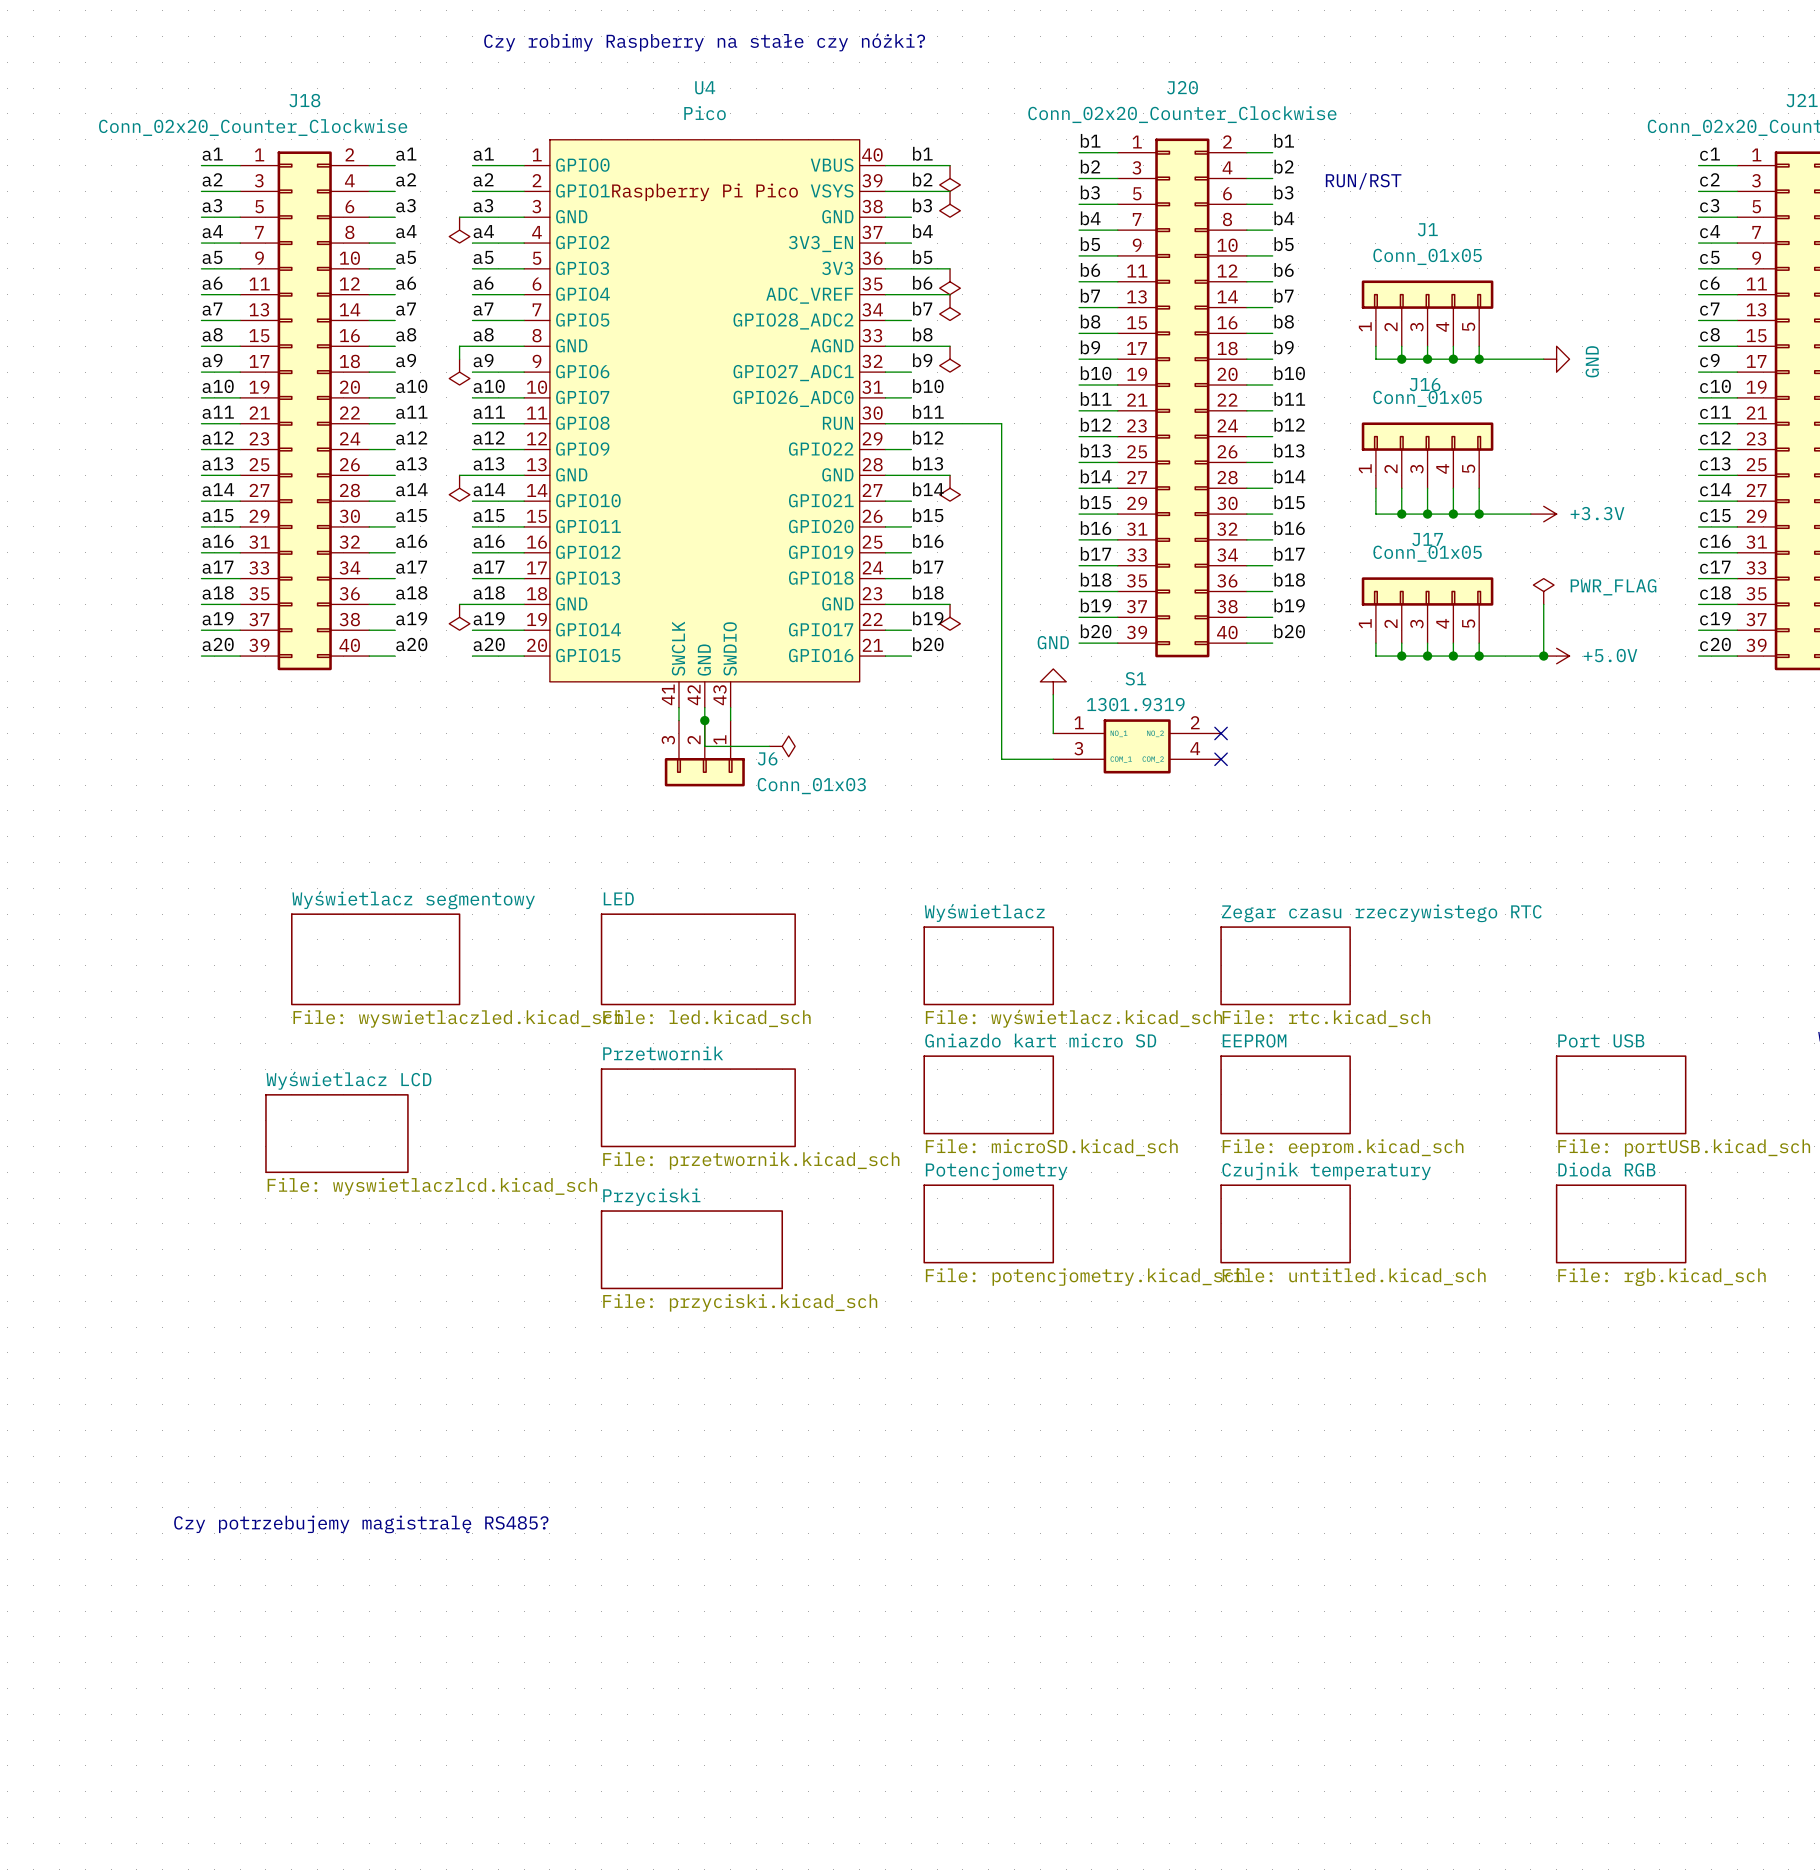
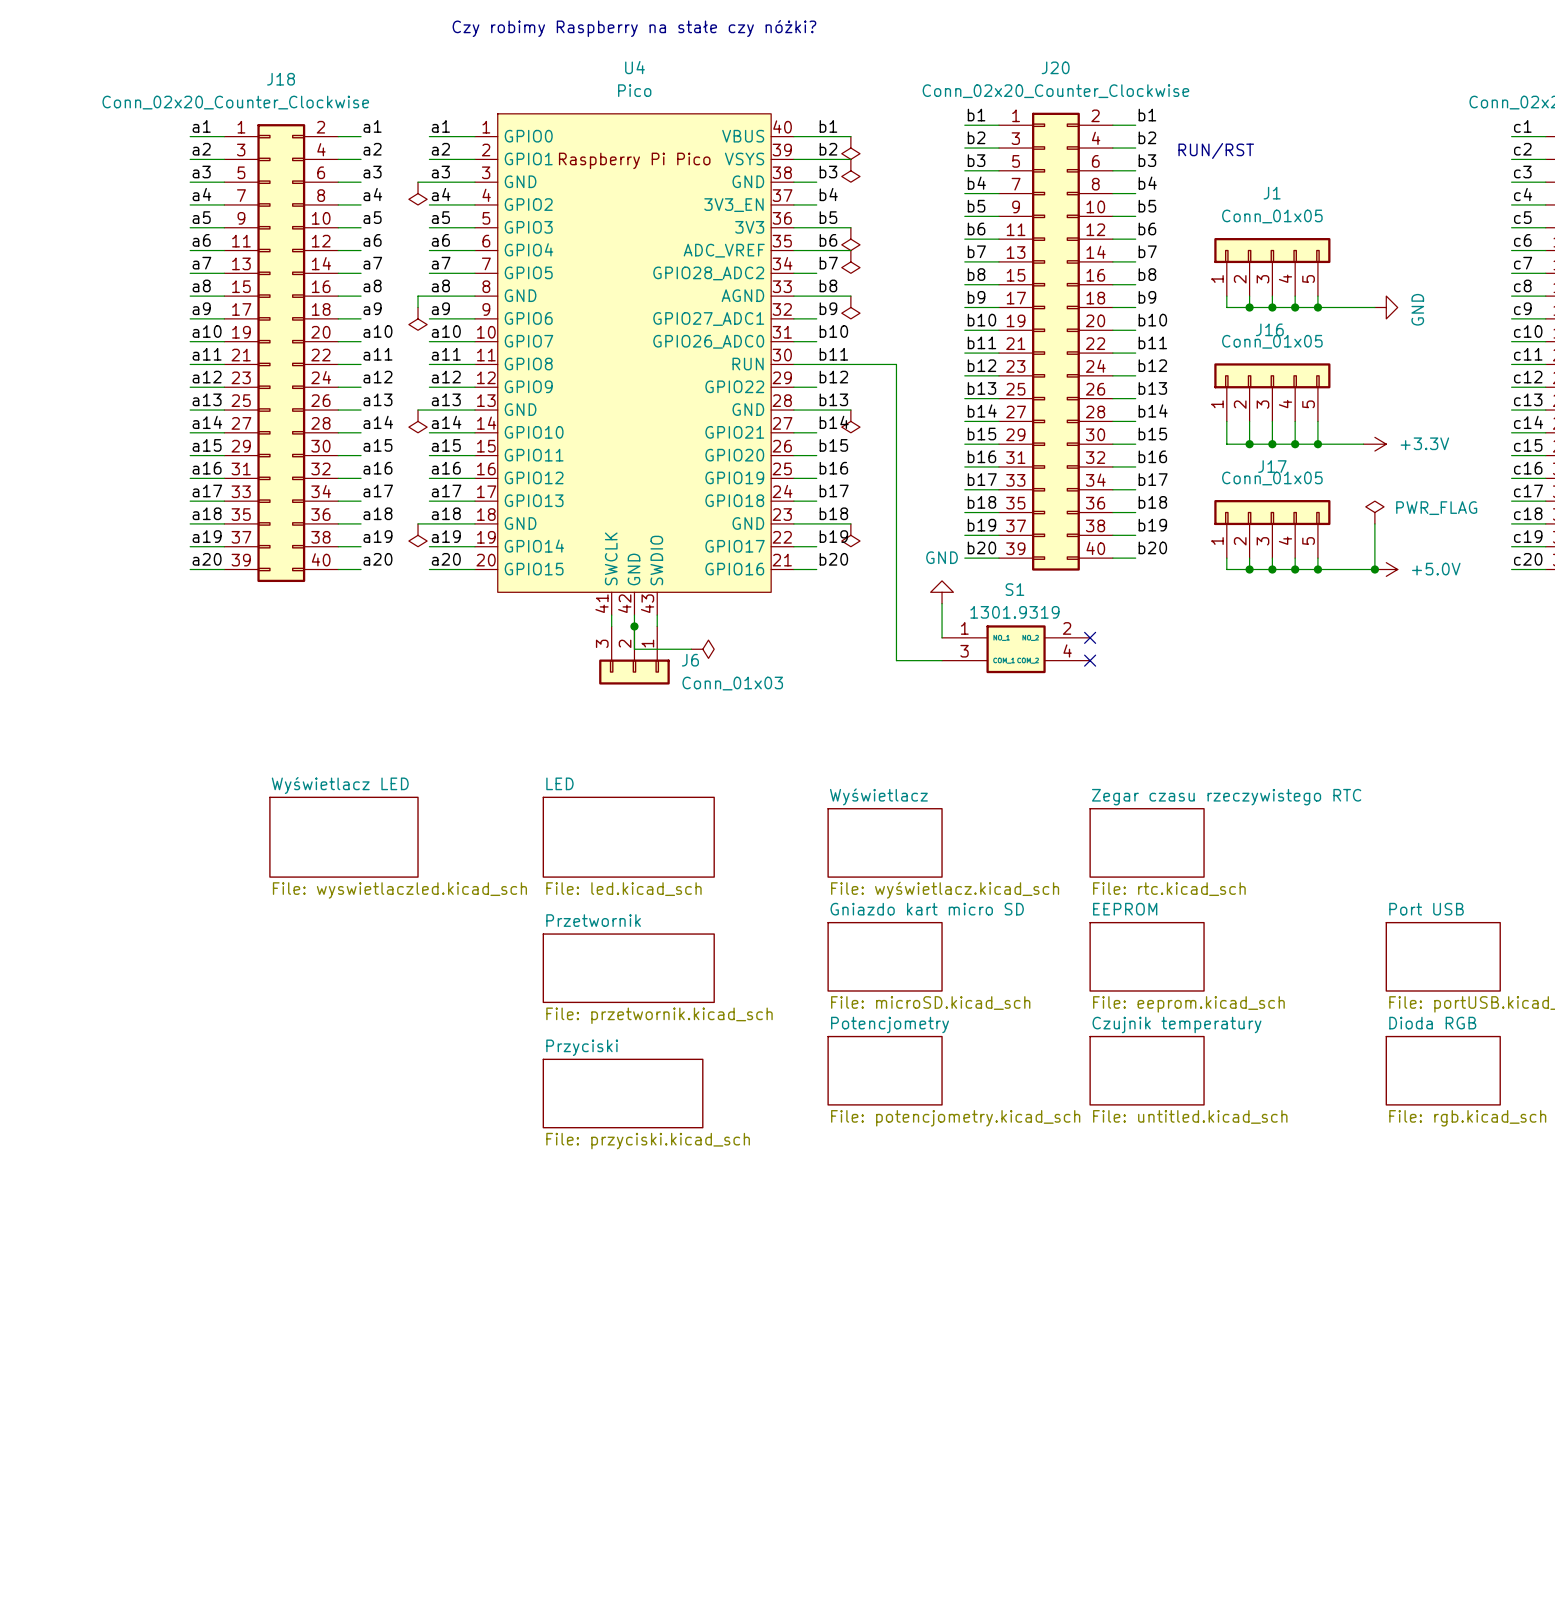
sheet Wyświetlacz segmentowy name: Wyświetlacz segmentowy (413, 900) -> Wyświetlacz LED (340, 785)
sheet Wyświetlacz LCD: File: wyswietlaczlcd.kicad_sch (336, 1133) -> none
text: Czy potrzebujemy magistralę RS485? (361, 1524) -> none

